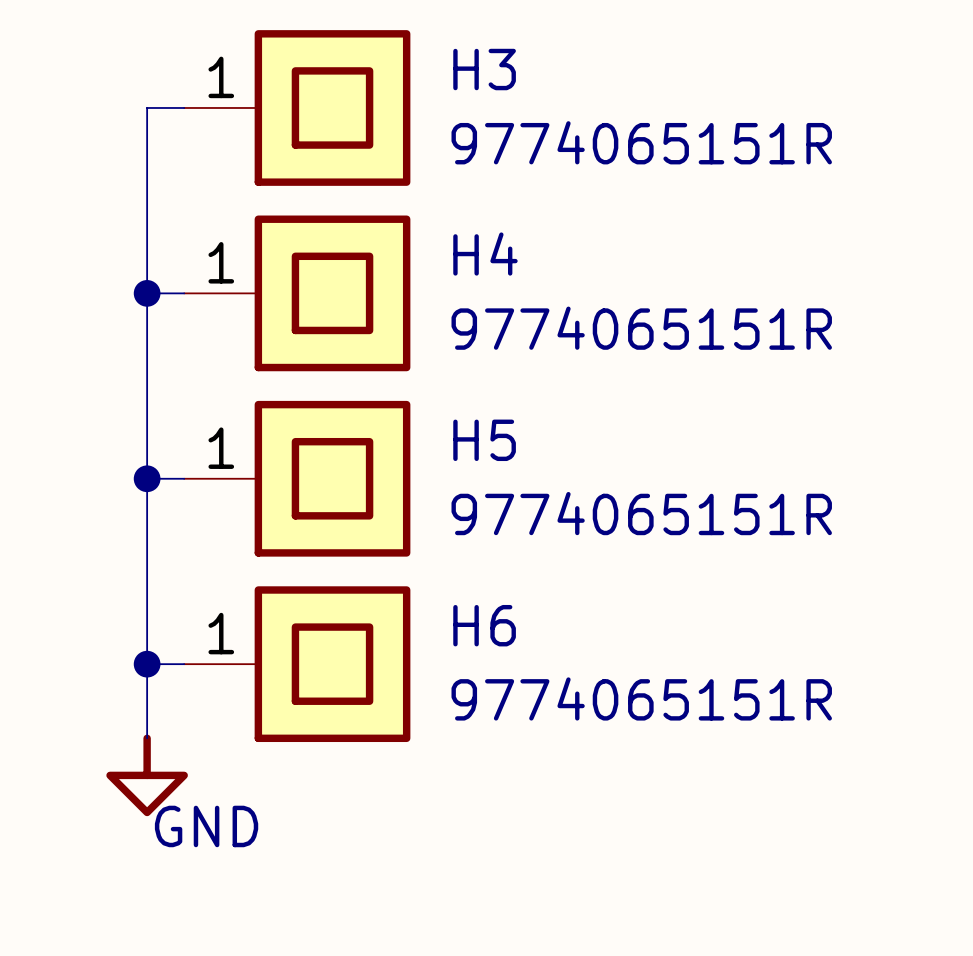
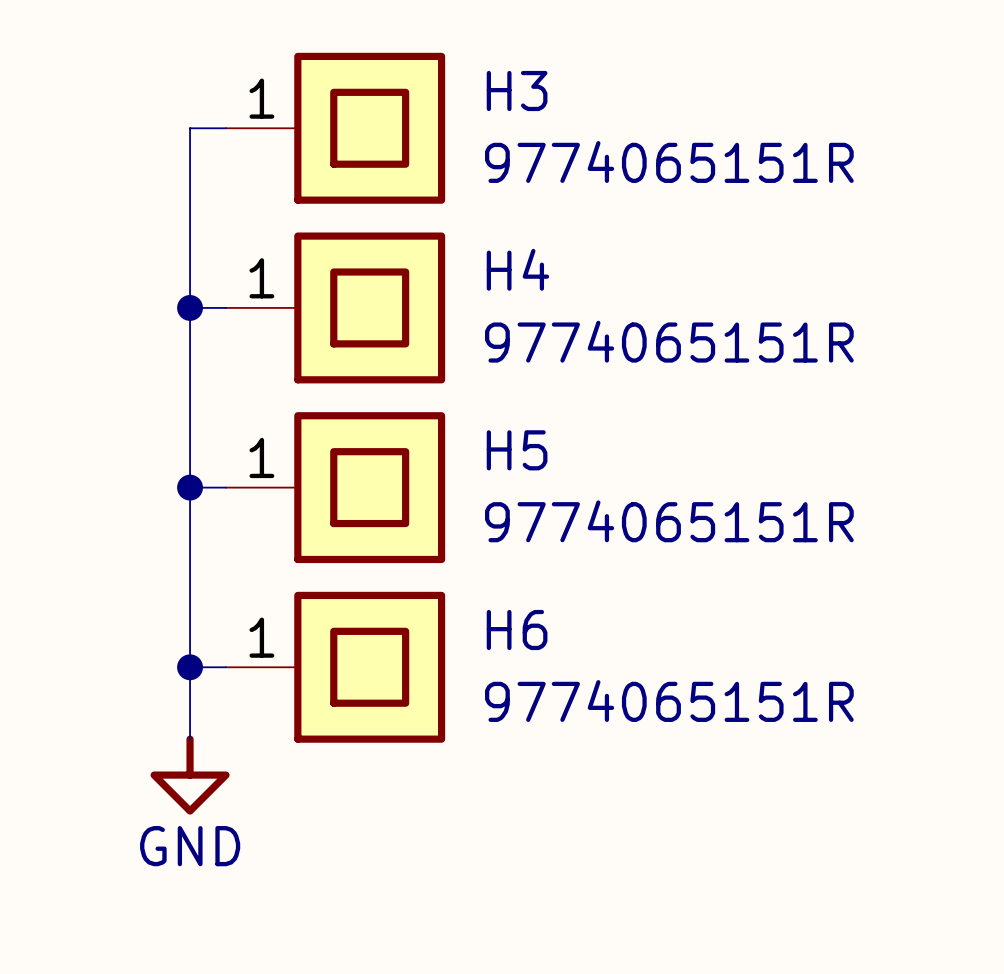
power symbol text position: GND (206, 826) -> GND (190, 846)

